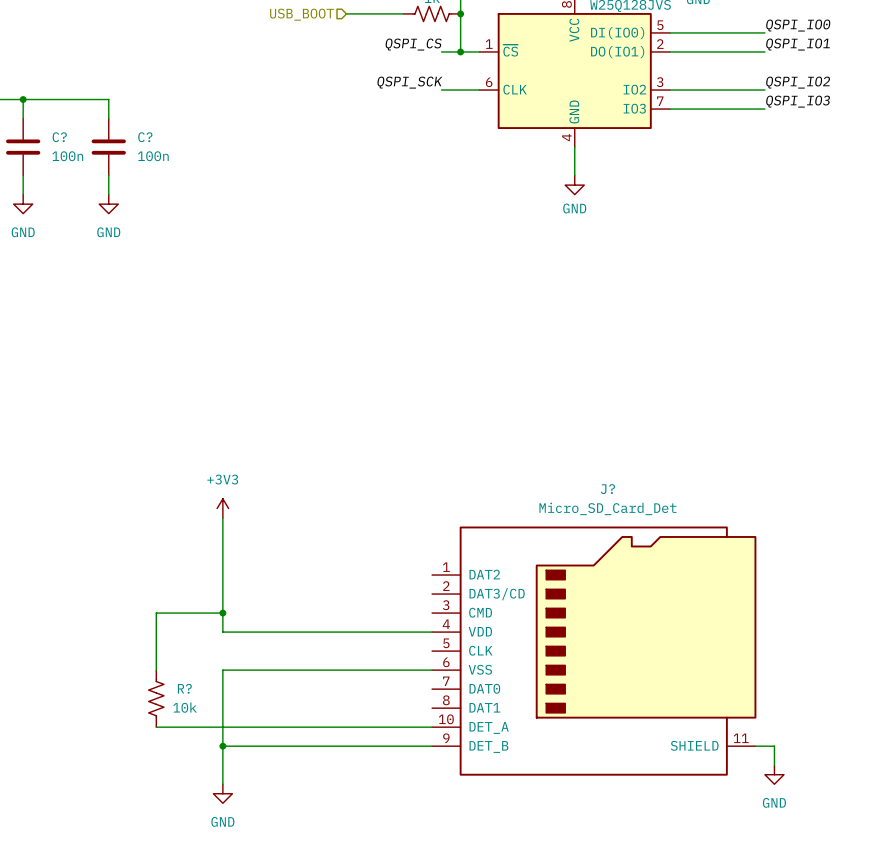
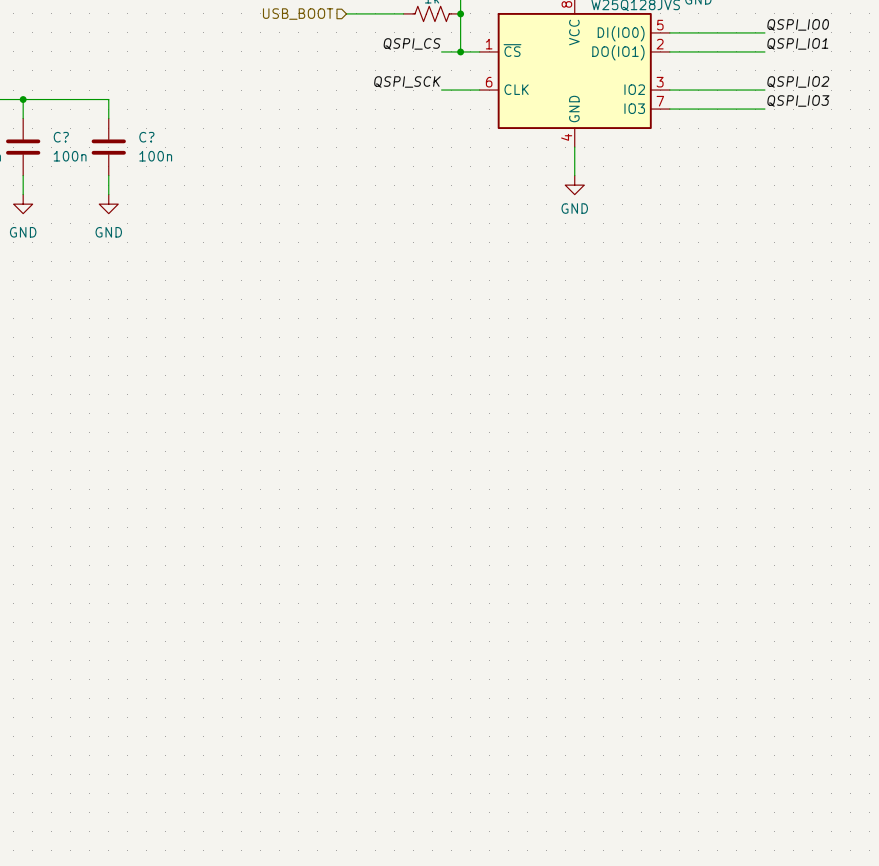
power symbol: +3V3 (222, 508) -> none
wire: (222, 517) (222, 632) (432, 632) -> none
wire: (222, 613) (156, 613) (156, 670) -> none
junction: (222, 613) -> none
J?: Micro_SD_Card_Det (594, 651) -> none
wire: (432, 670) (222, 670) (222, 784) -> none
R?: 10k (156, 698) -> none
wire: (156, 727) (432, 727) -> none
wire: (222, 746) (432, 746) -> none
junction: (222, 746) -> none
wire: (755, 746) (774, 746) (774, 765) -> none
power symbol: GND (774, 774) -> none
power symbol: GND (222, 793) -> none

